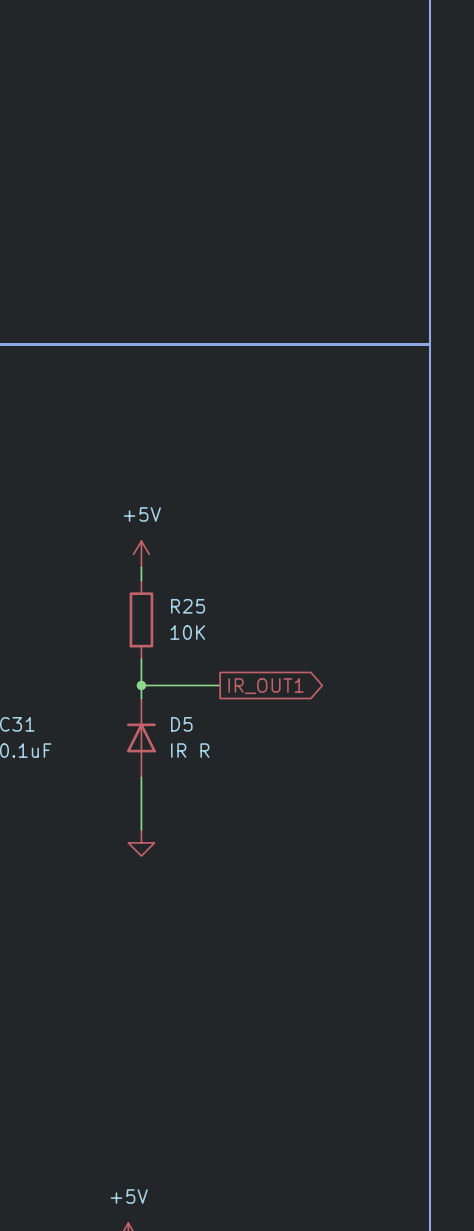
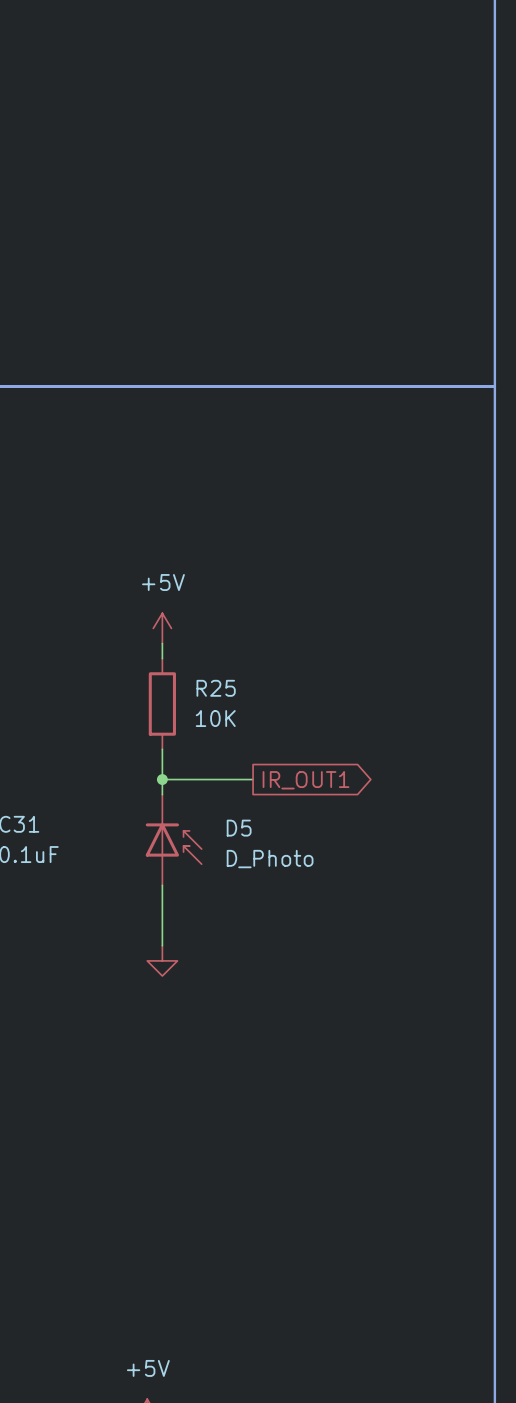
D5 symbol: [127, 698, 156, 778] -> [145, 794, 202, 886]
D5 value: IR R (190, 750) -> D_Photo (270, 859)

